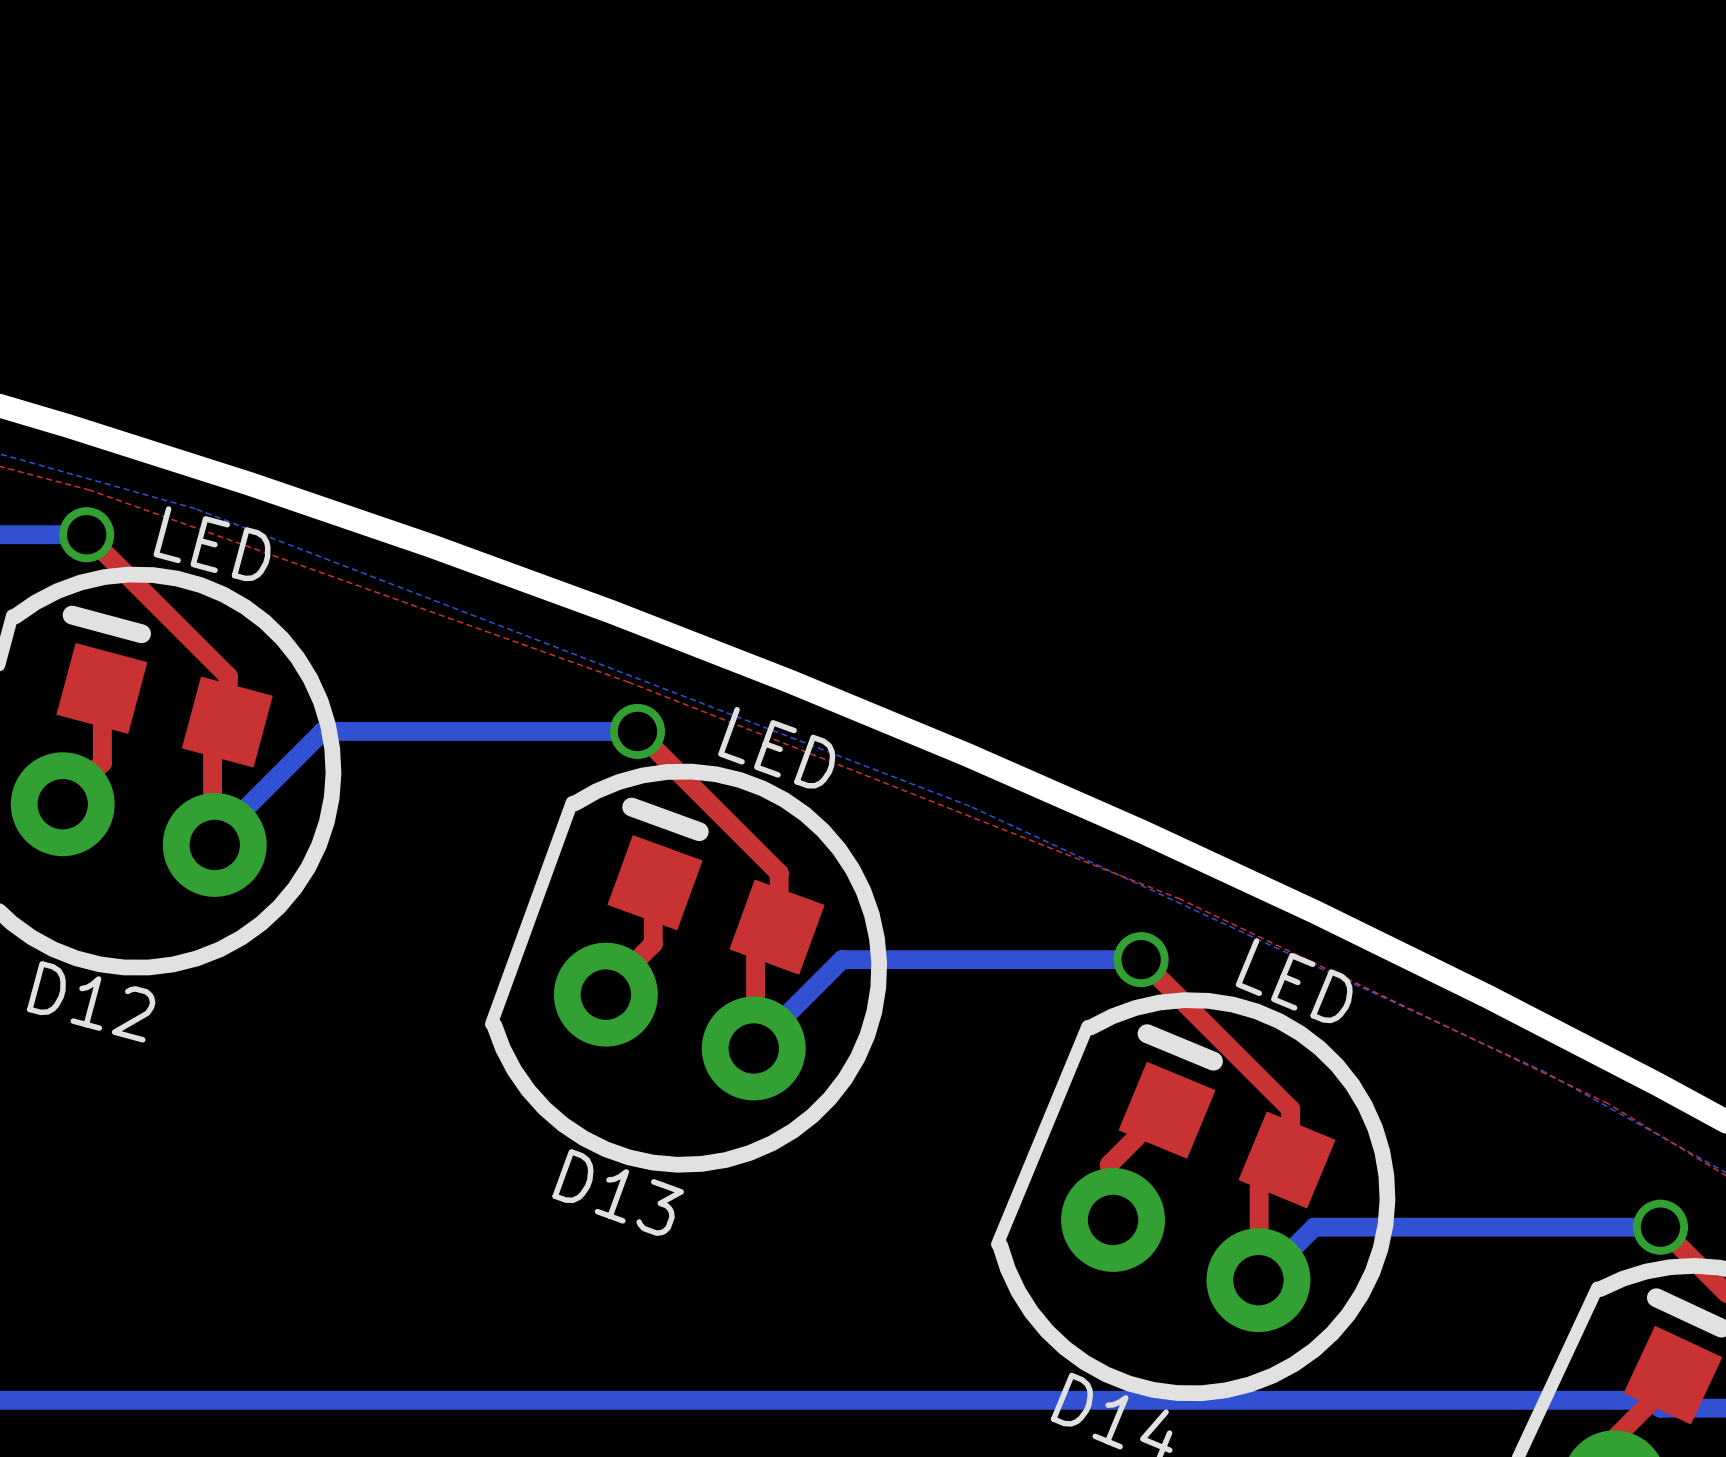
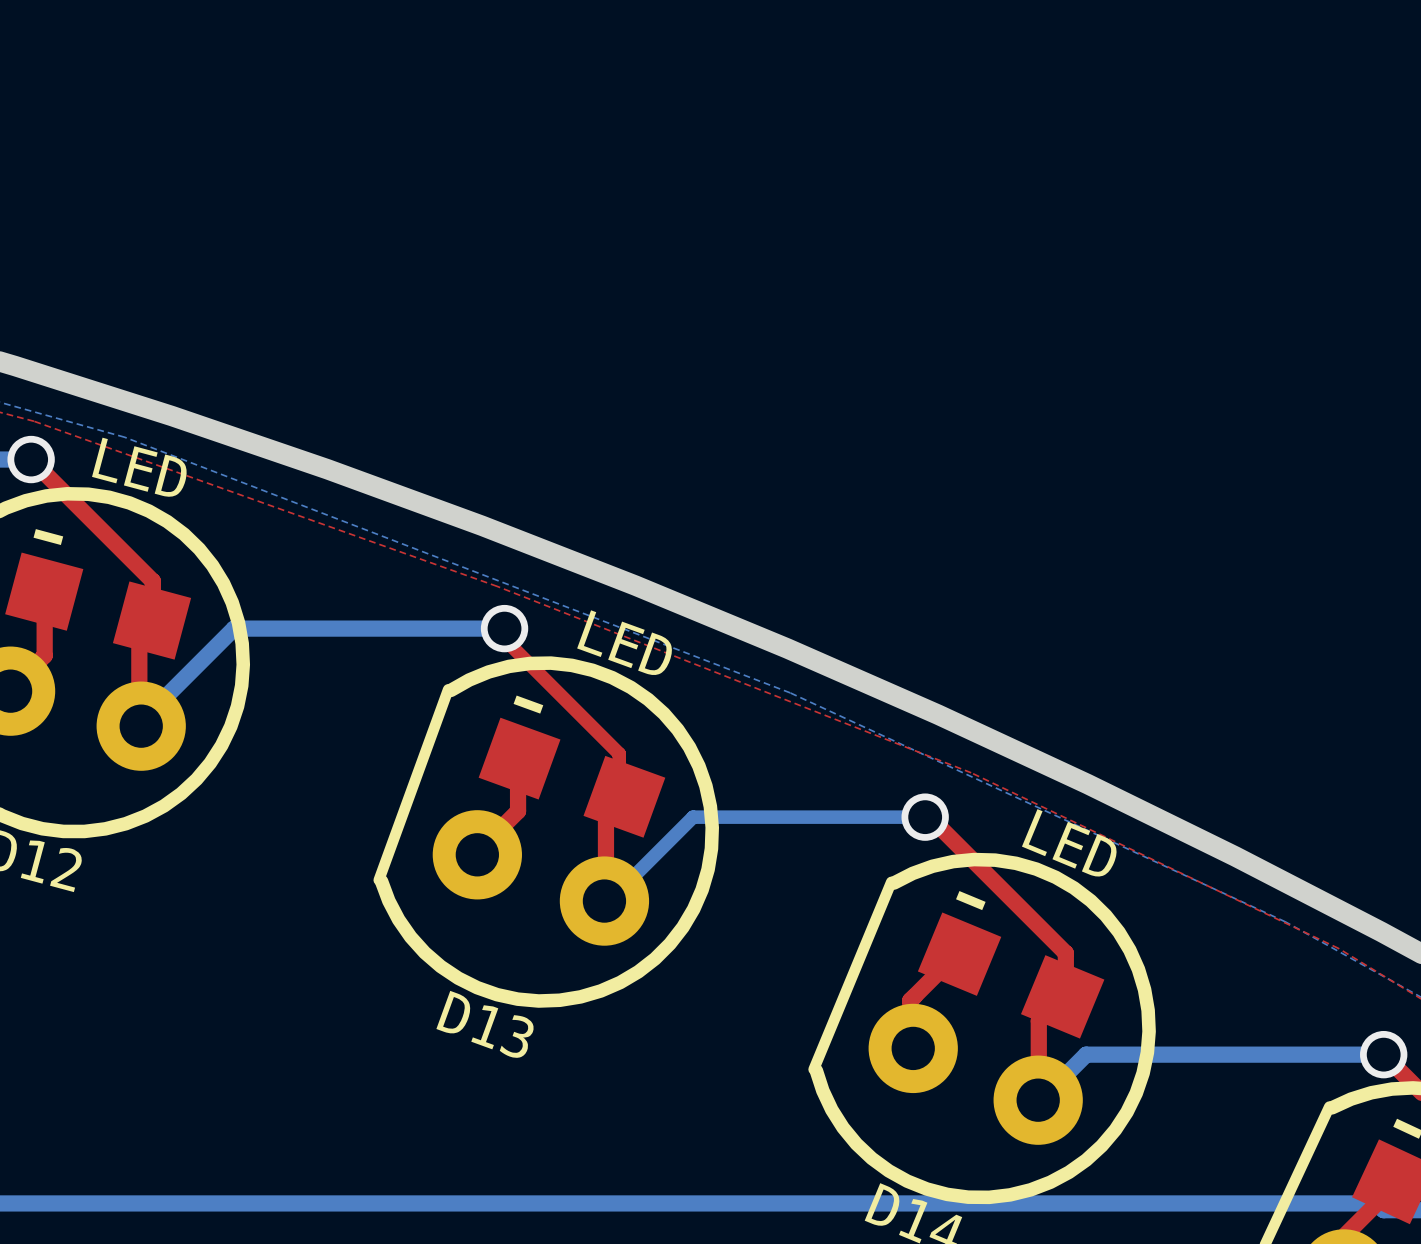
top track: none -> (492, 627) (619, 753) (619, 796)
top track: (637, 731) (779, 873) (779, 928) -> none
bottom track: (1141, 959) (842, 959) (753, 1048) -> (925, 817) (693, 817) (608, 901) (604, 901)
via position: (1141, 959) -> (925, 817)

